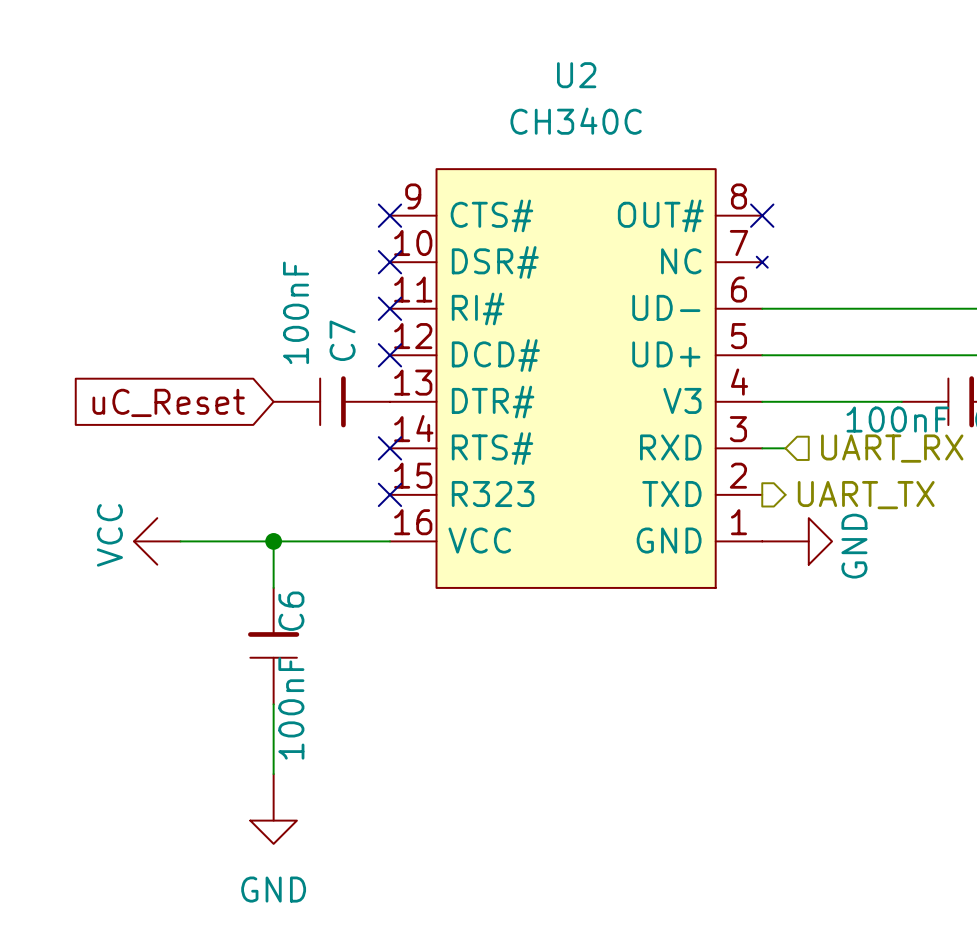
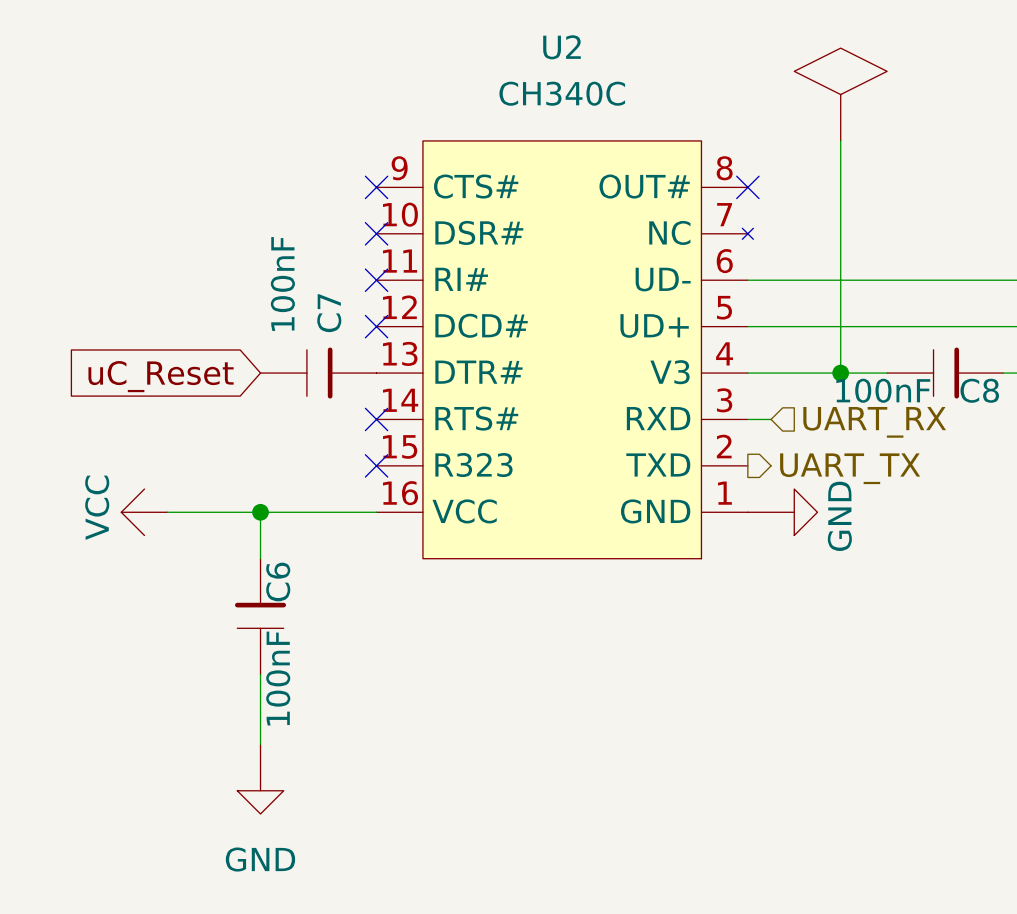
power symbol: none -> (840, 94)
wire: none -> (840, 140) (840, 373)
junction: none -> (840, 373)

